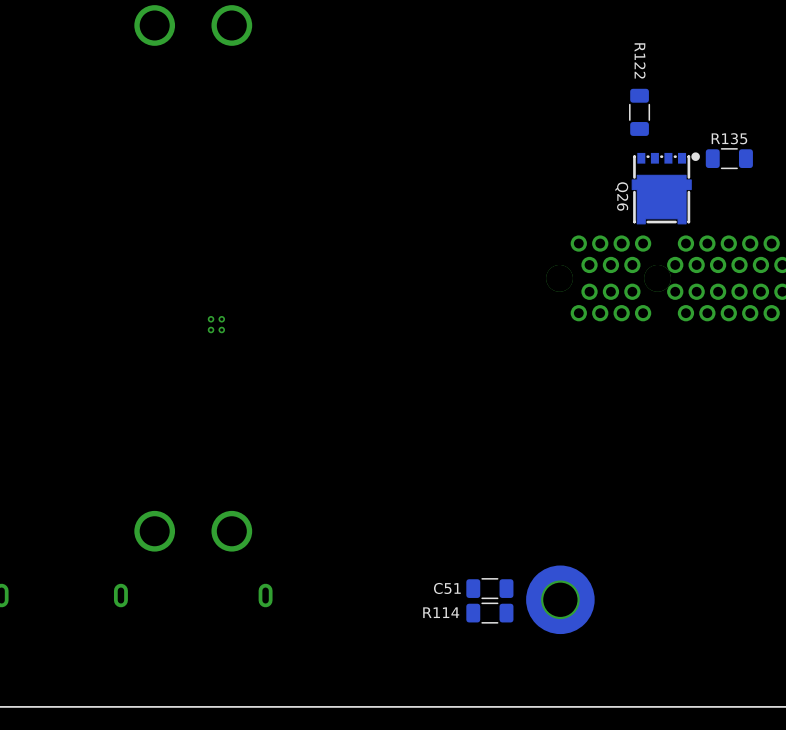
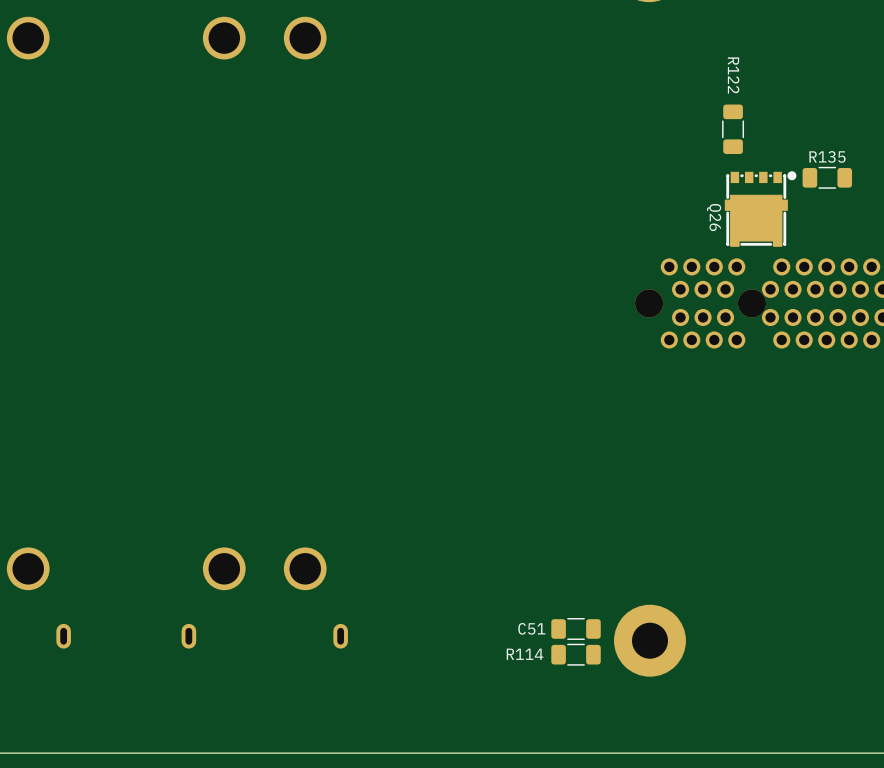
part: (216, 324) -> none

